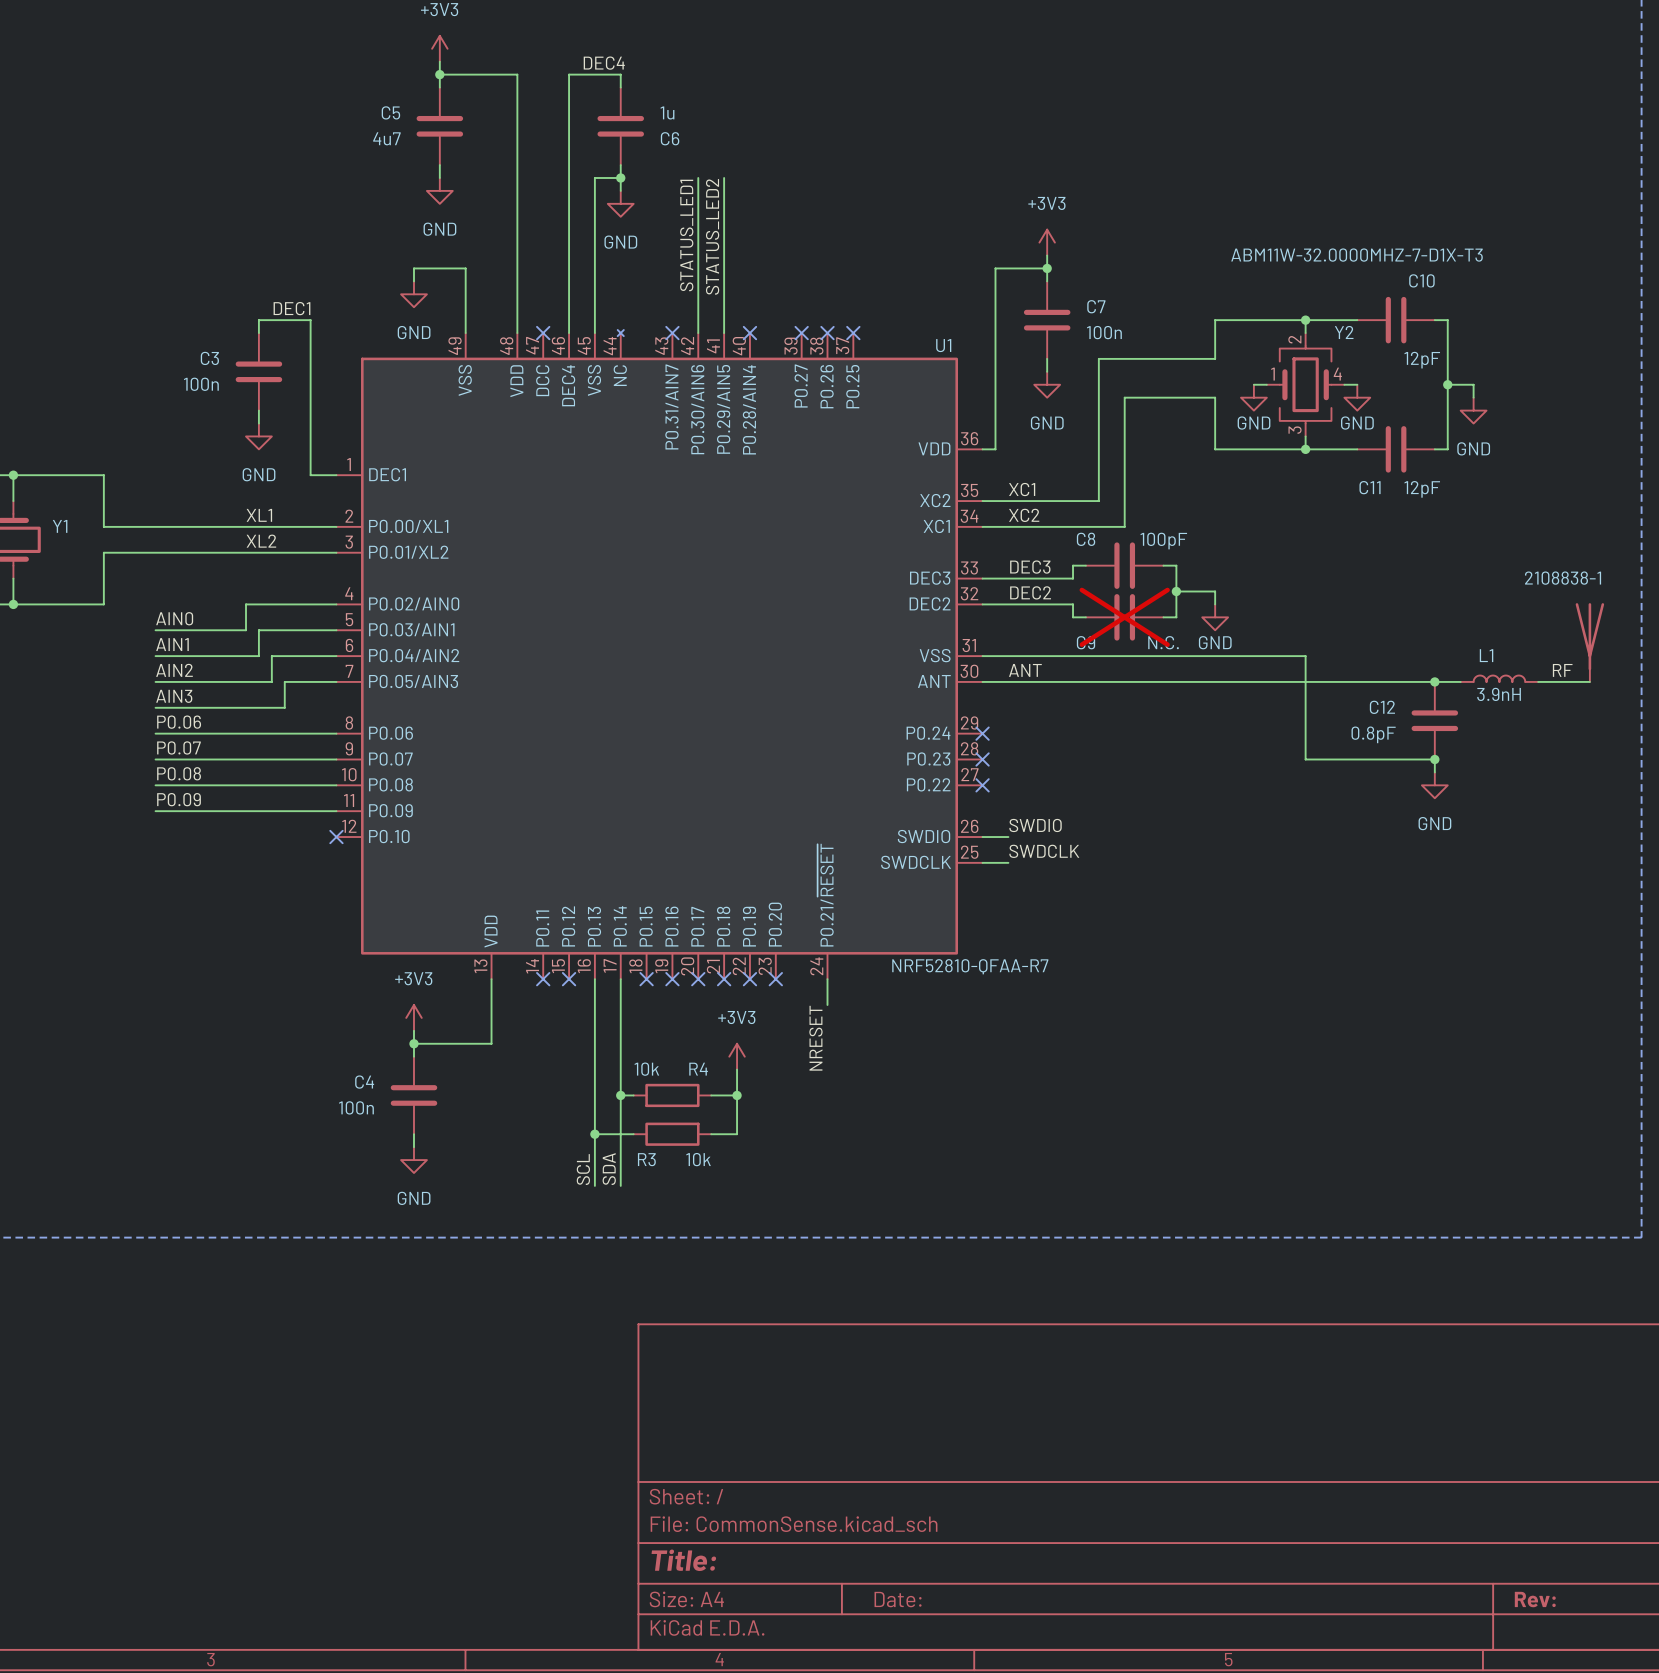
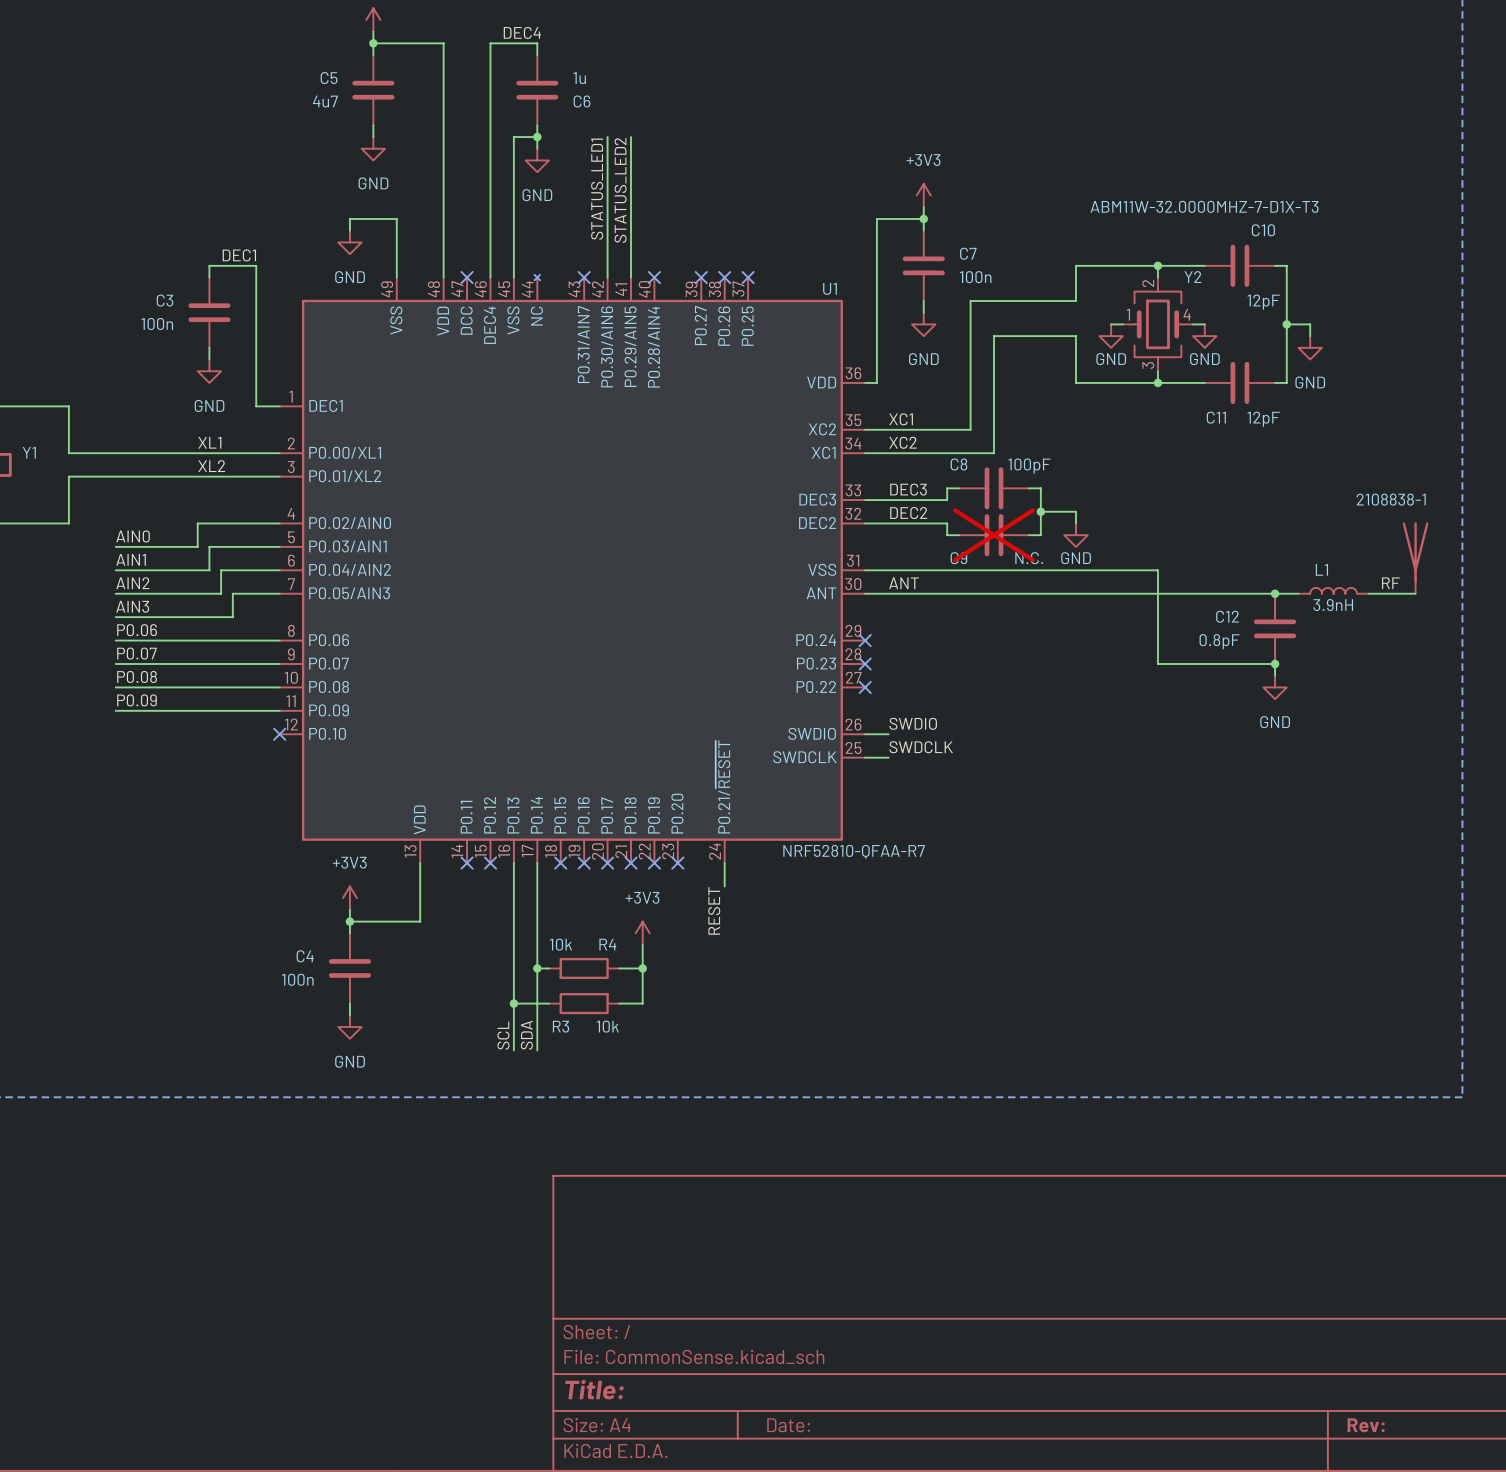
label: NRESET (815, 1038) -> RESET (714, 910)

